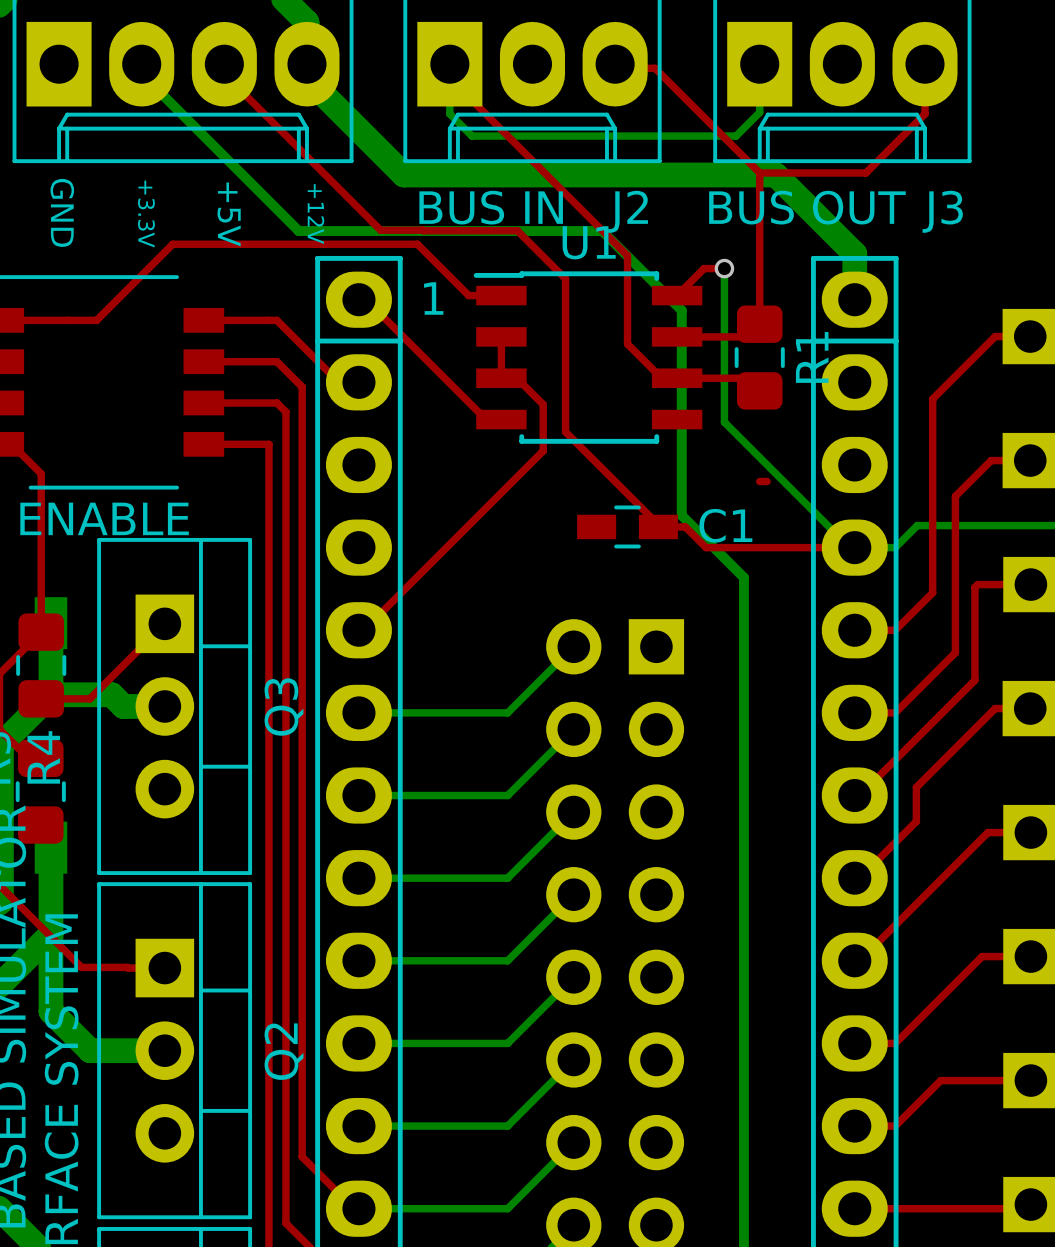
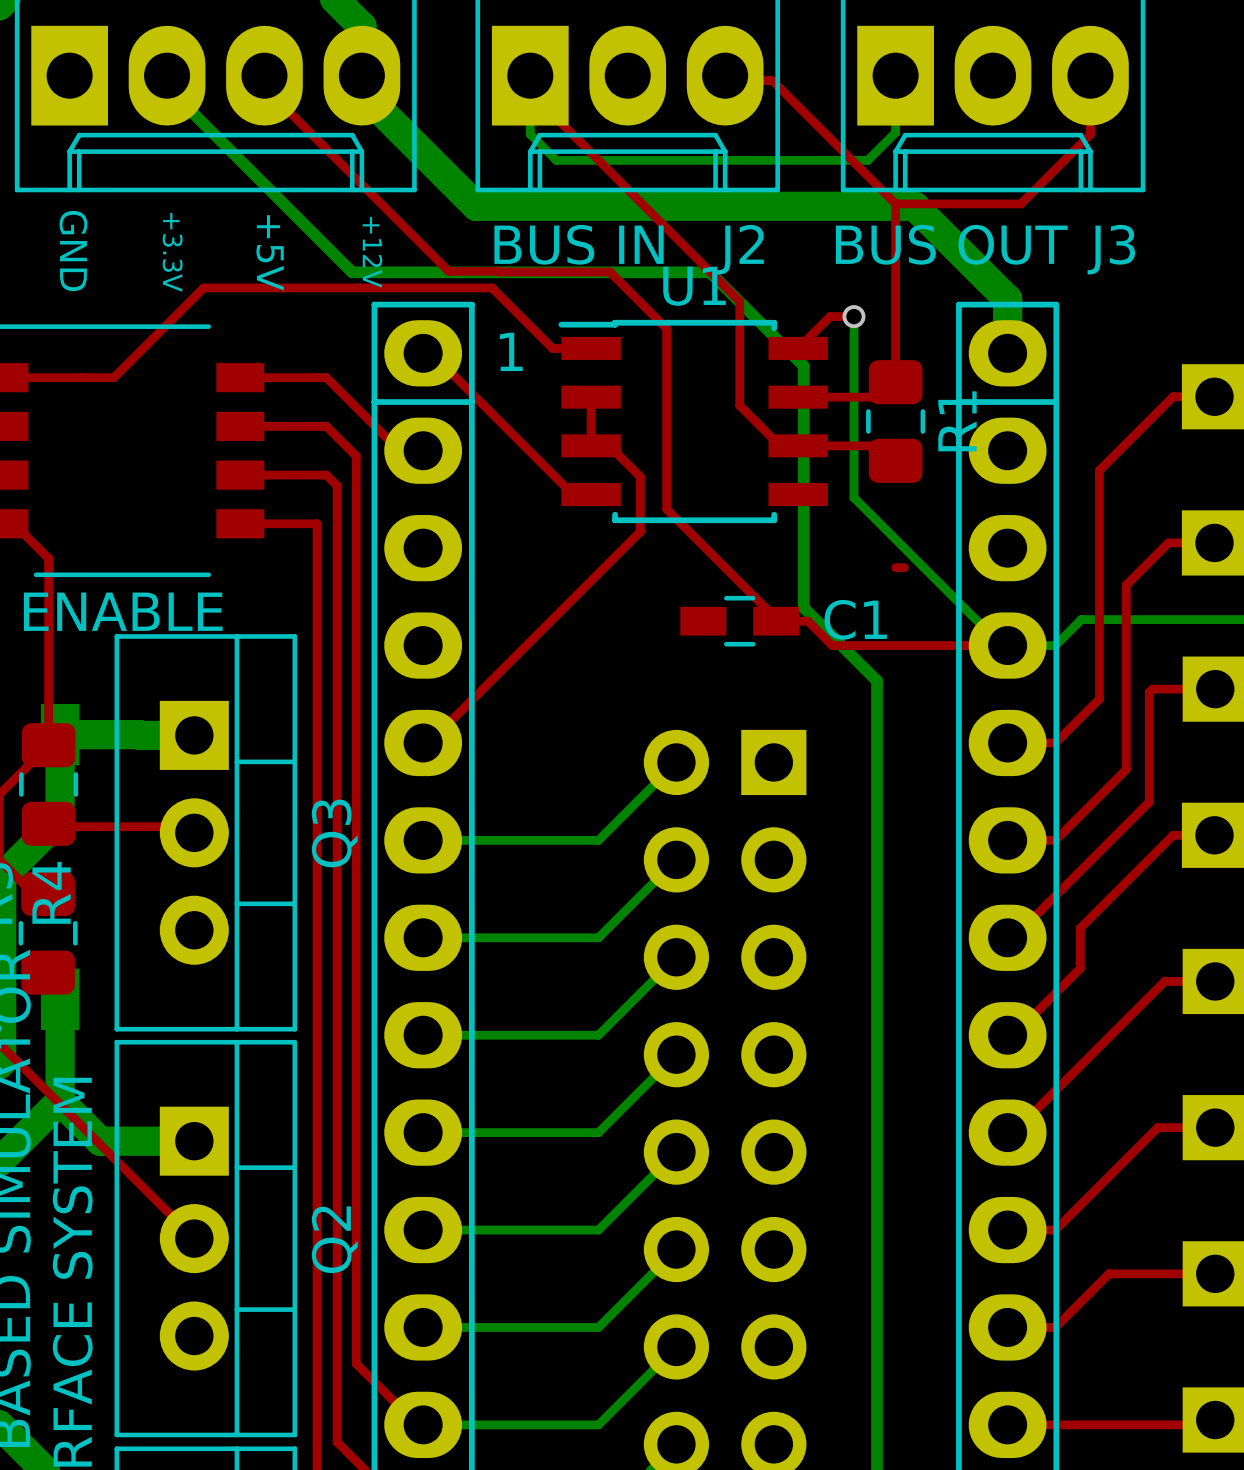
bottom track: none -> (60, 734) (194, 735)
top track: (164, 623) (89, 698) (41, 698) -> none
bottom track: (50, 694) (111, 694) (123, 706) (164, 706) -> none
top track: none -> (48, 826) (188, 826)
bottom track: (50, 934) (50, 1011) (90, 1050) (164, 1050) -> (60, 1101) (100, 1141) (194, 1141)
top track: (81, 967) (164, 968) -> (96, 1140) (194, 1238)

